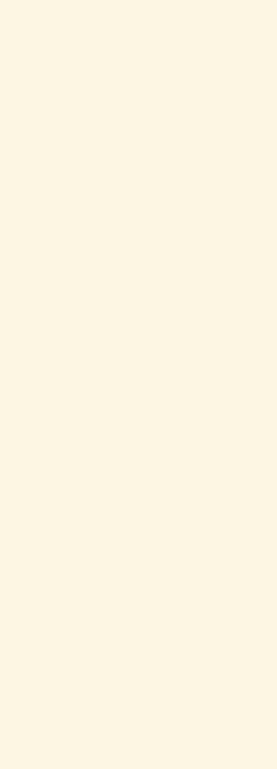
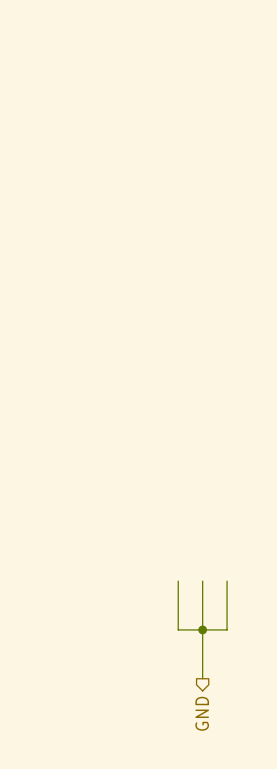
wire: none -> (178, 581) (178, 629) (227, 629) (227, 581)
wire: none -> (202, 581) (202, 678)
junction: none -> (202, 629)
hierarchical label: none -> GND (202, 713)

